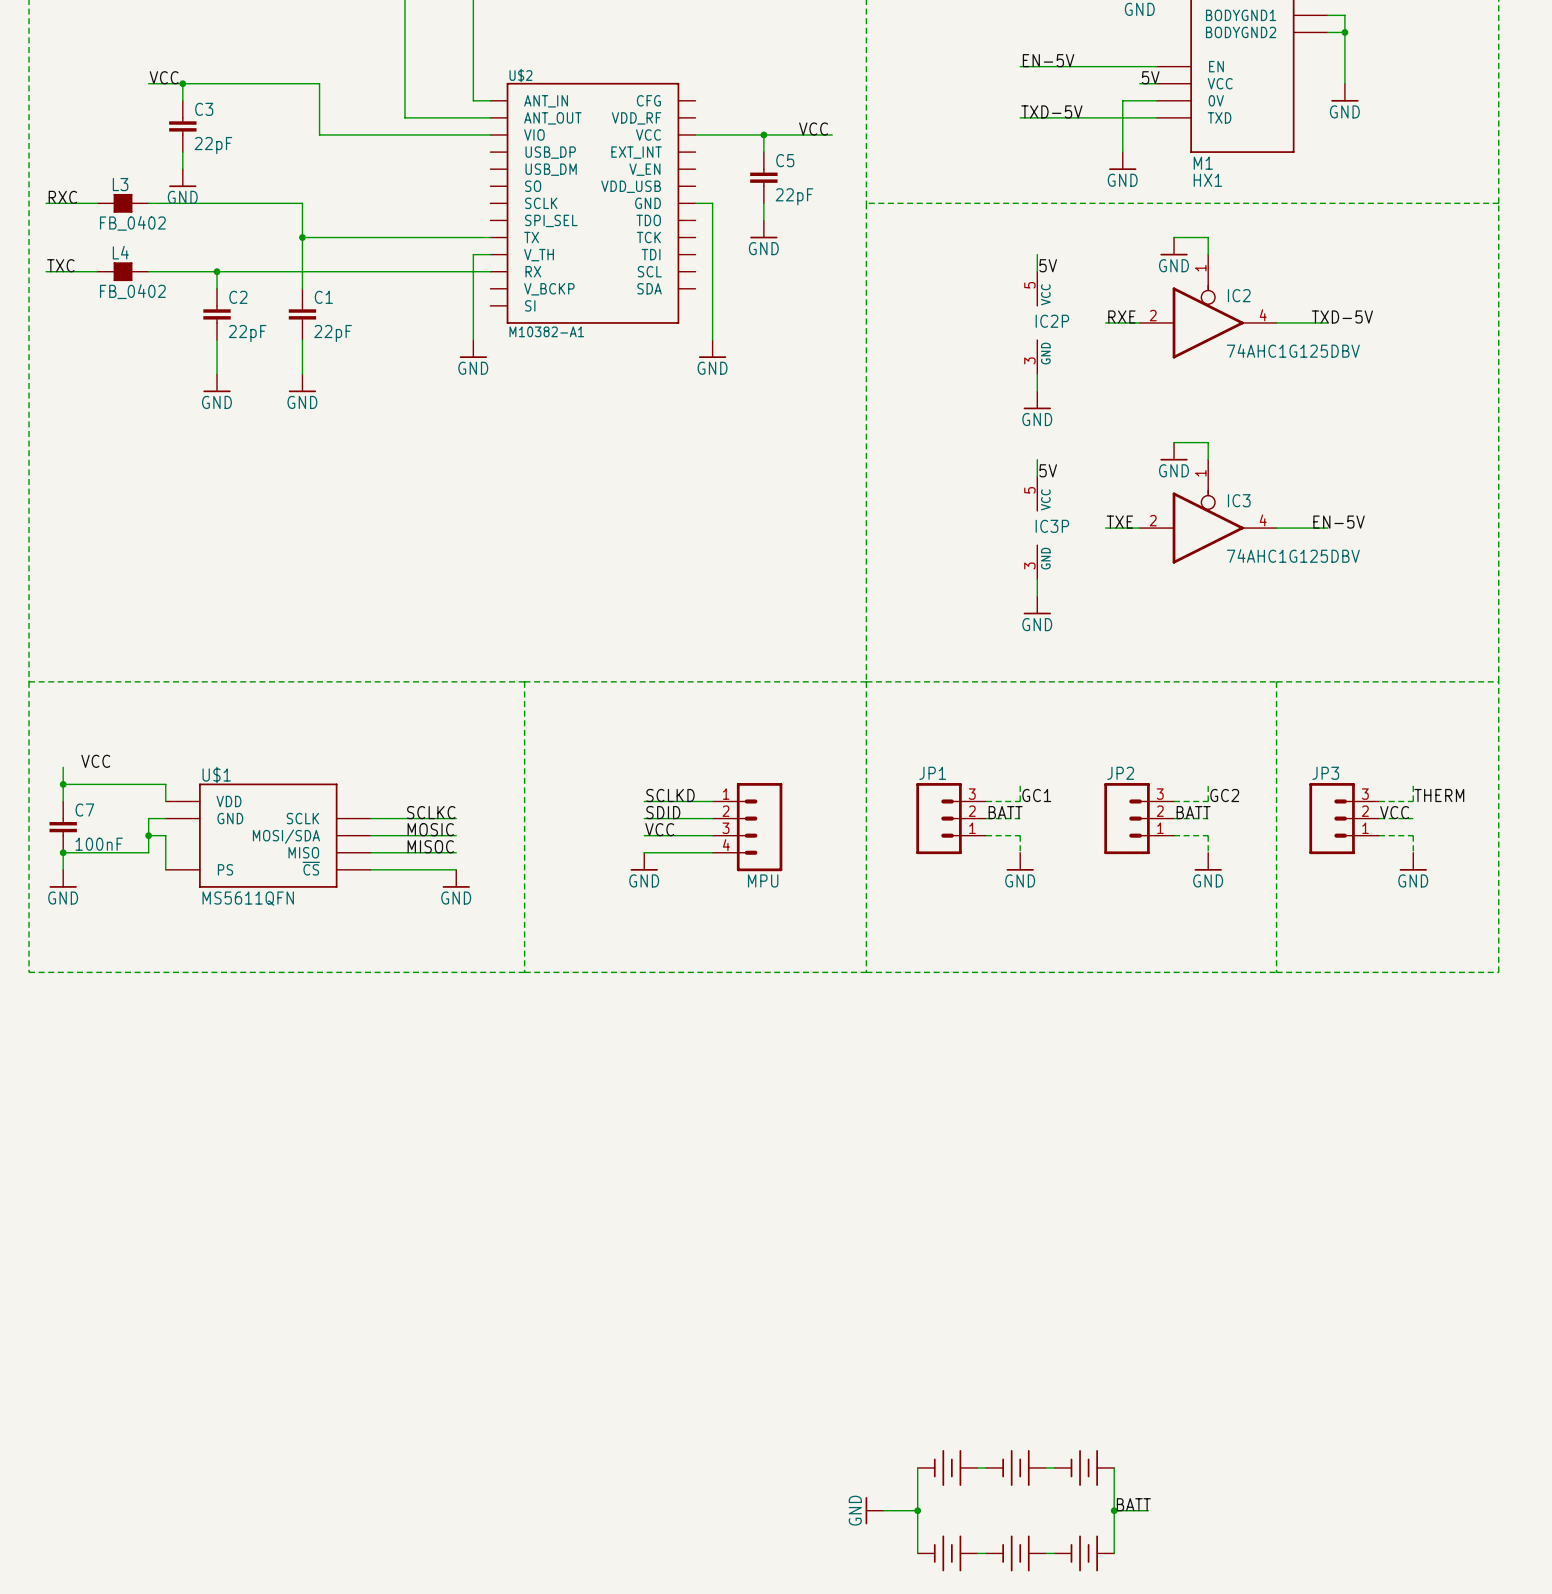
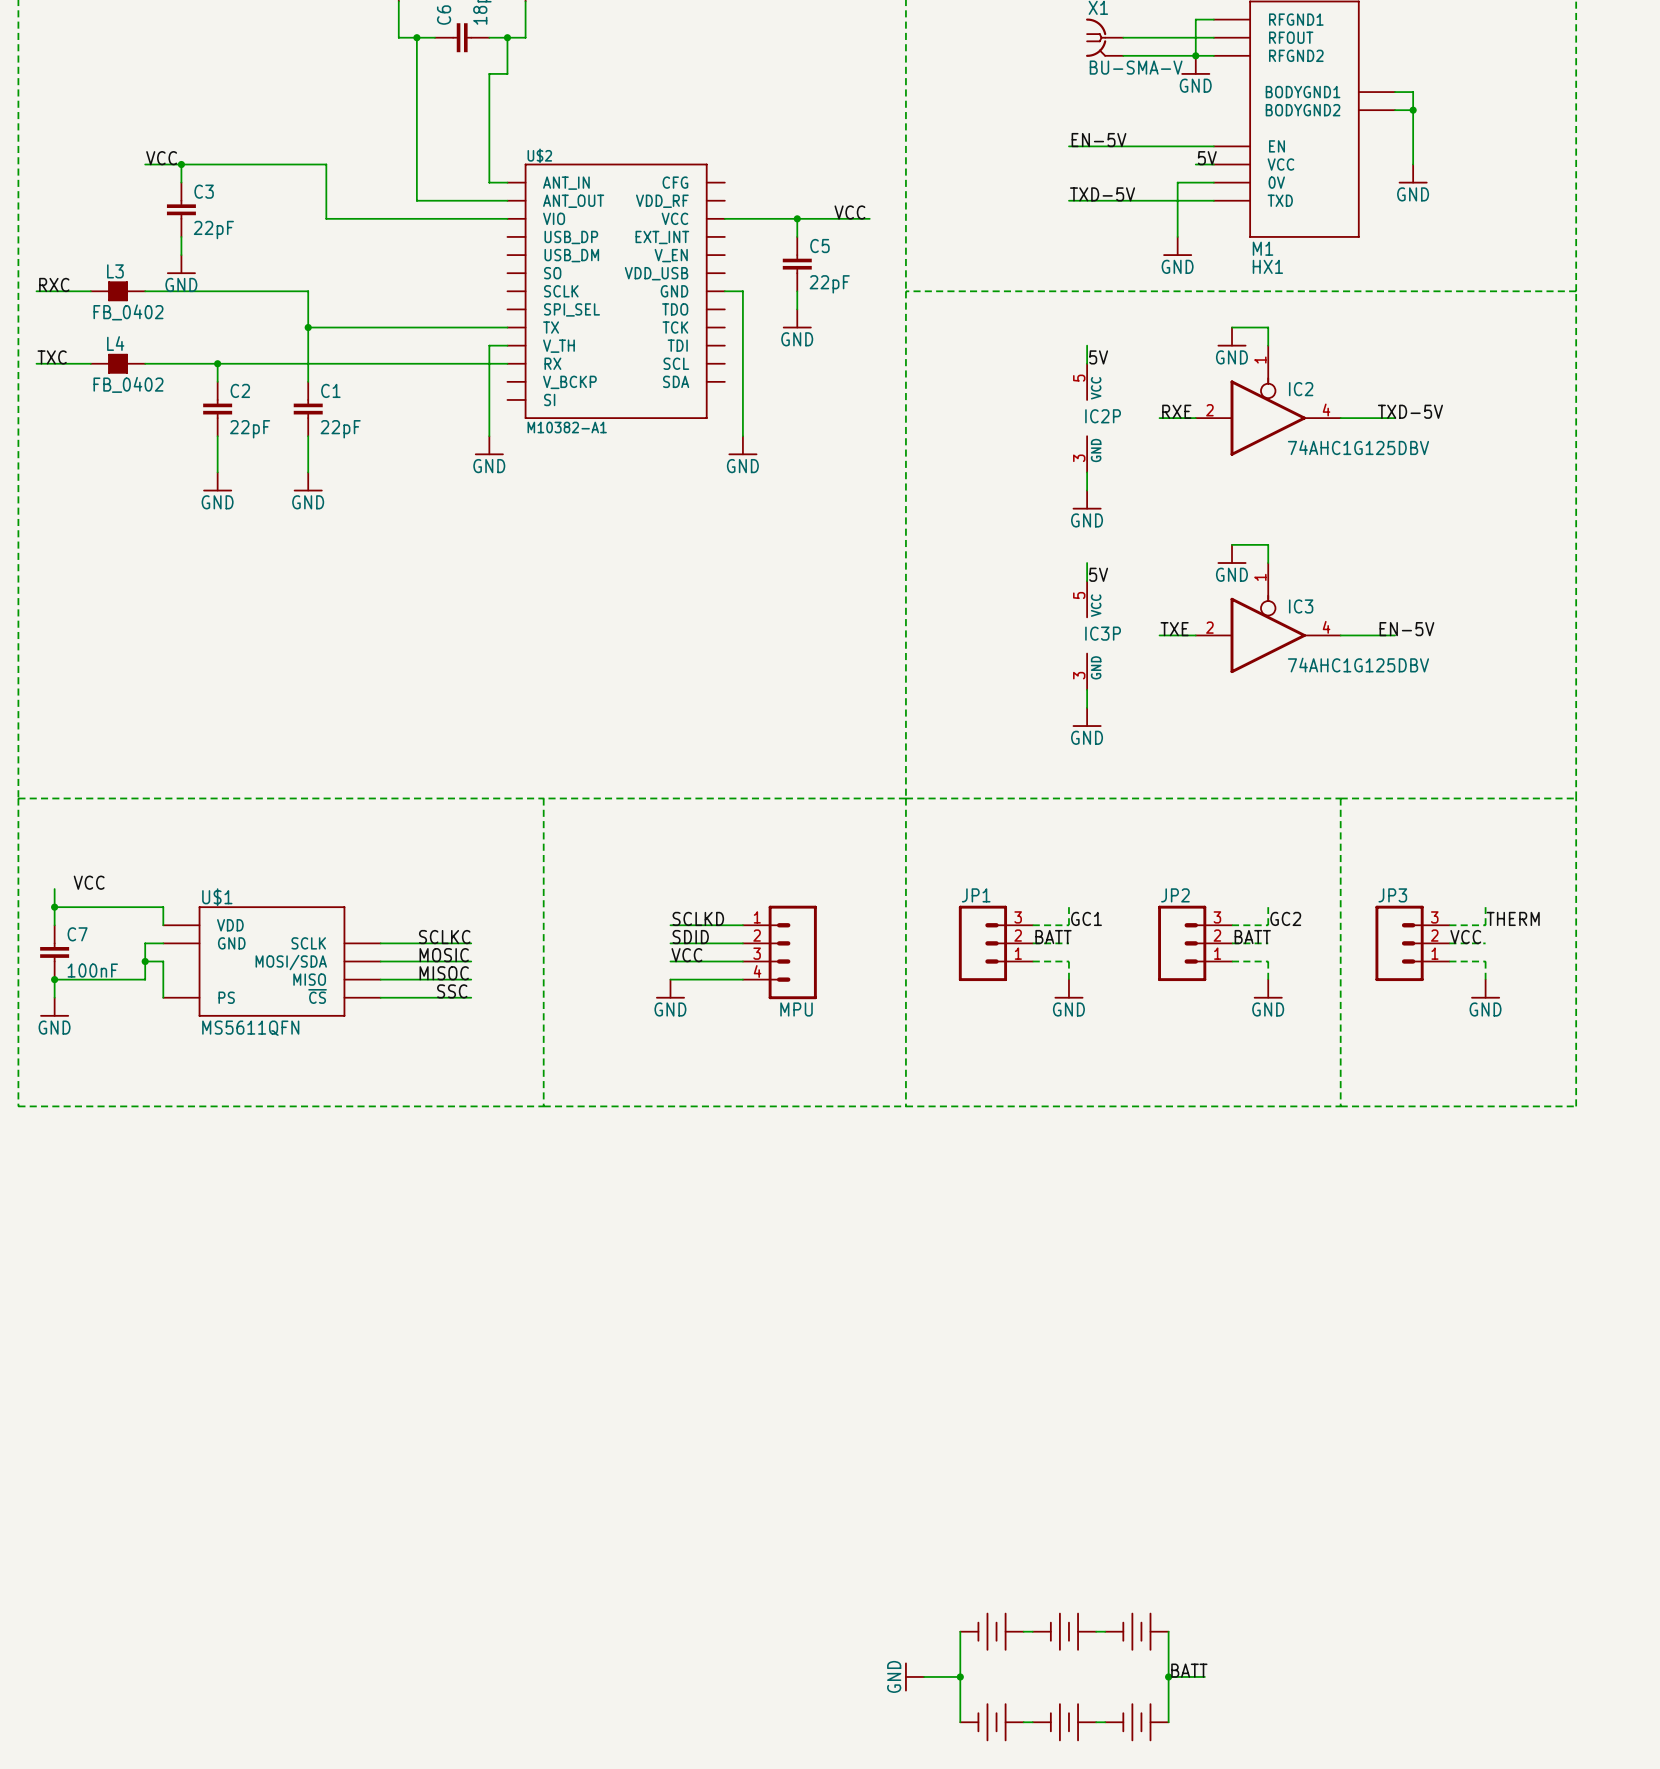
label: none -> SSC (452, 991)
power symbol: GND (456, 878) -> none

